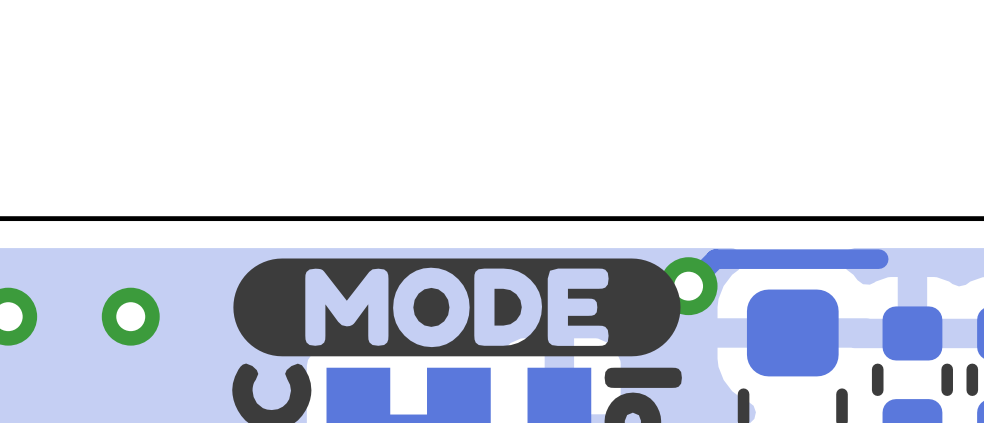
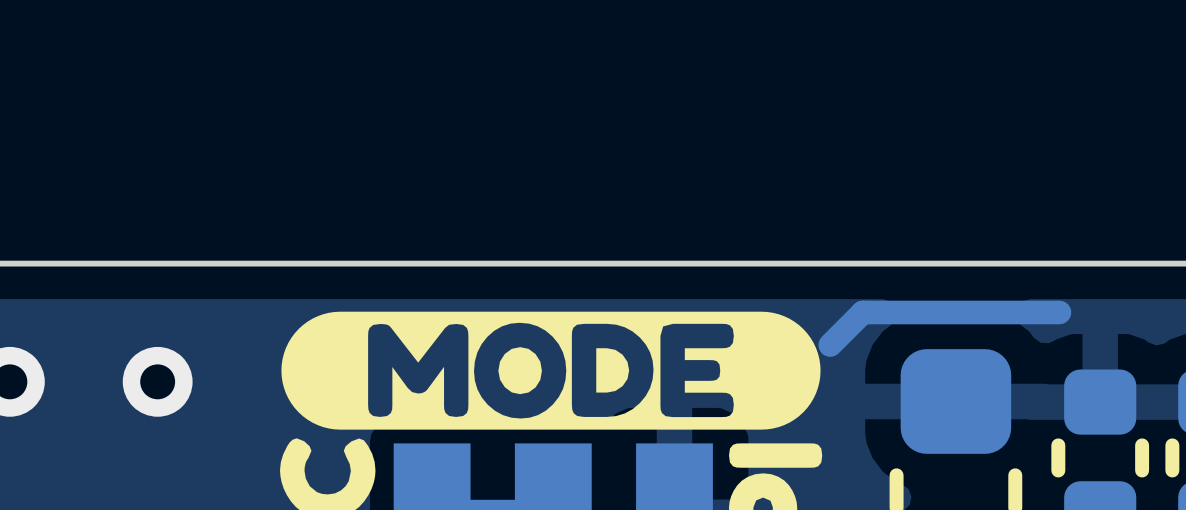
via: (688, 286) -> none

